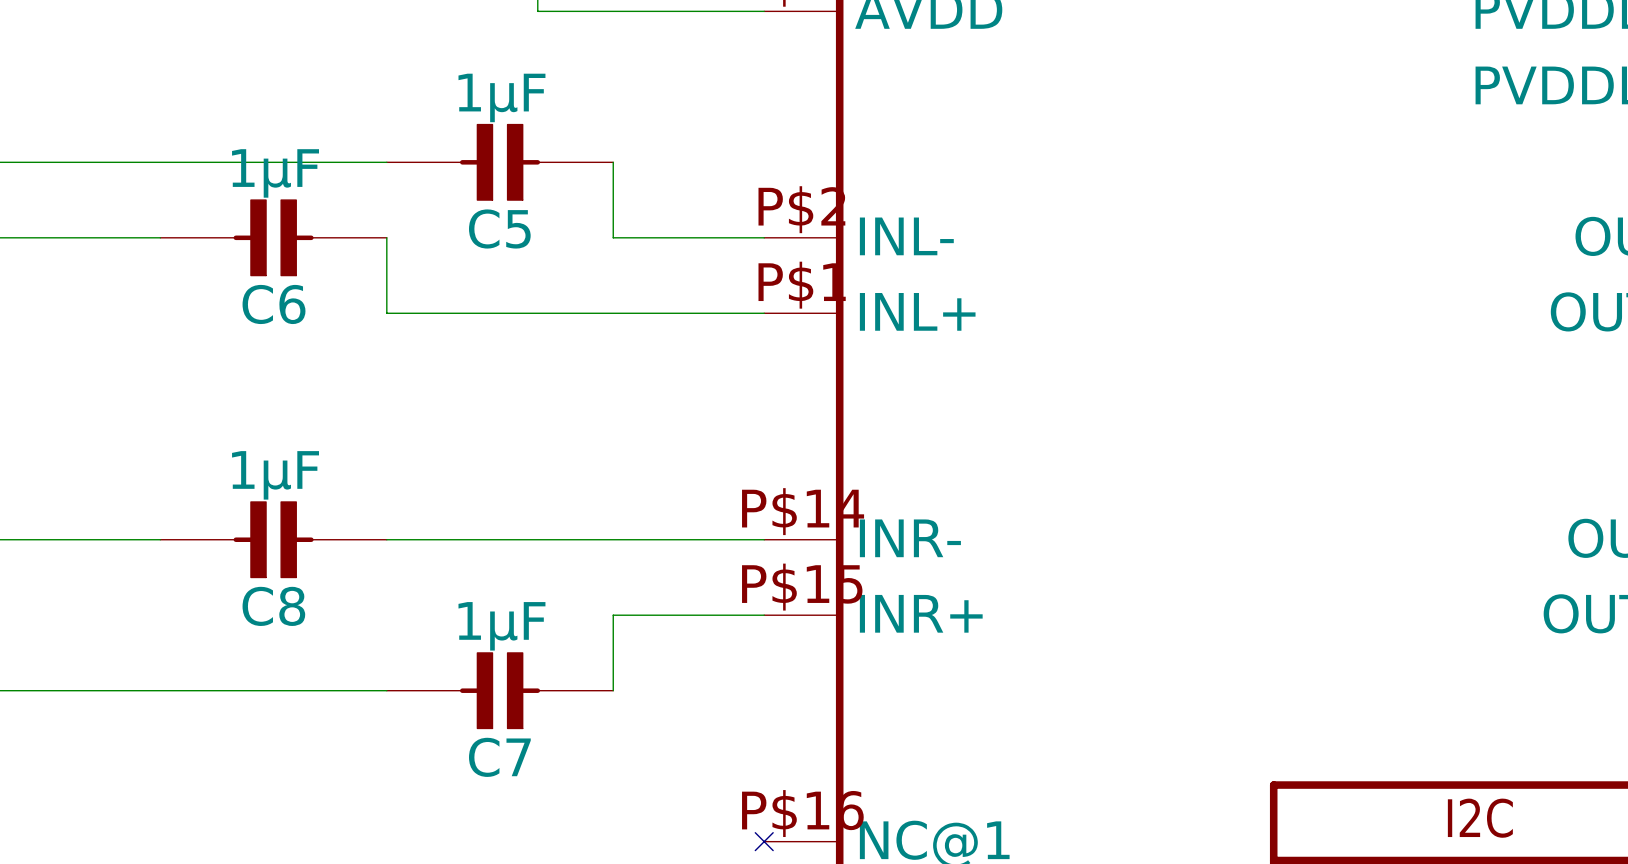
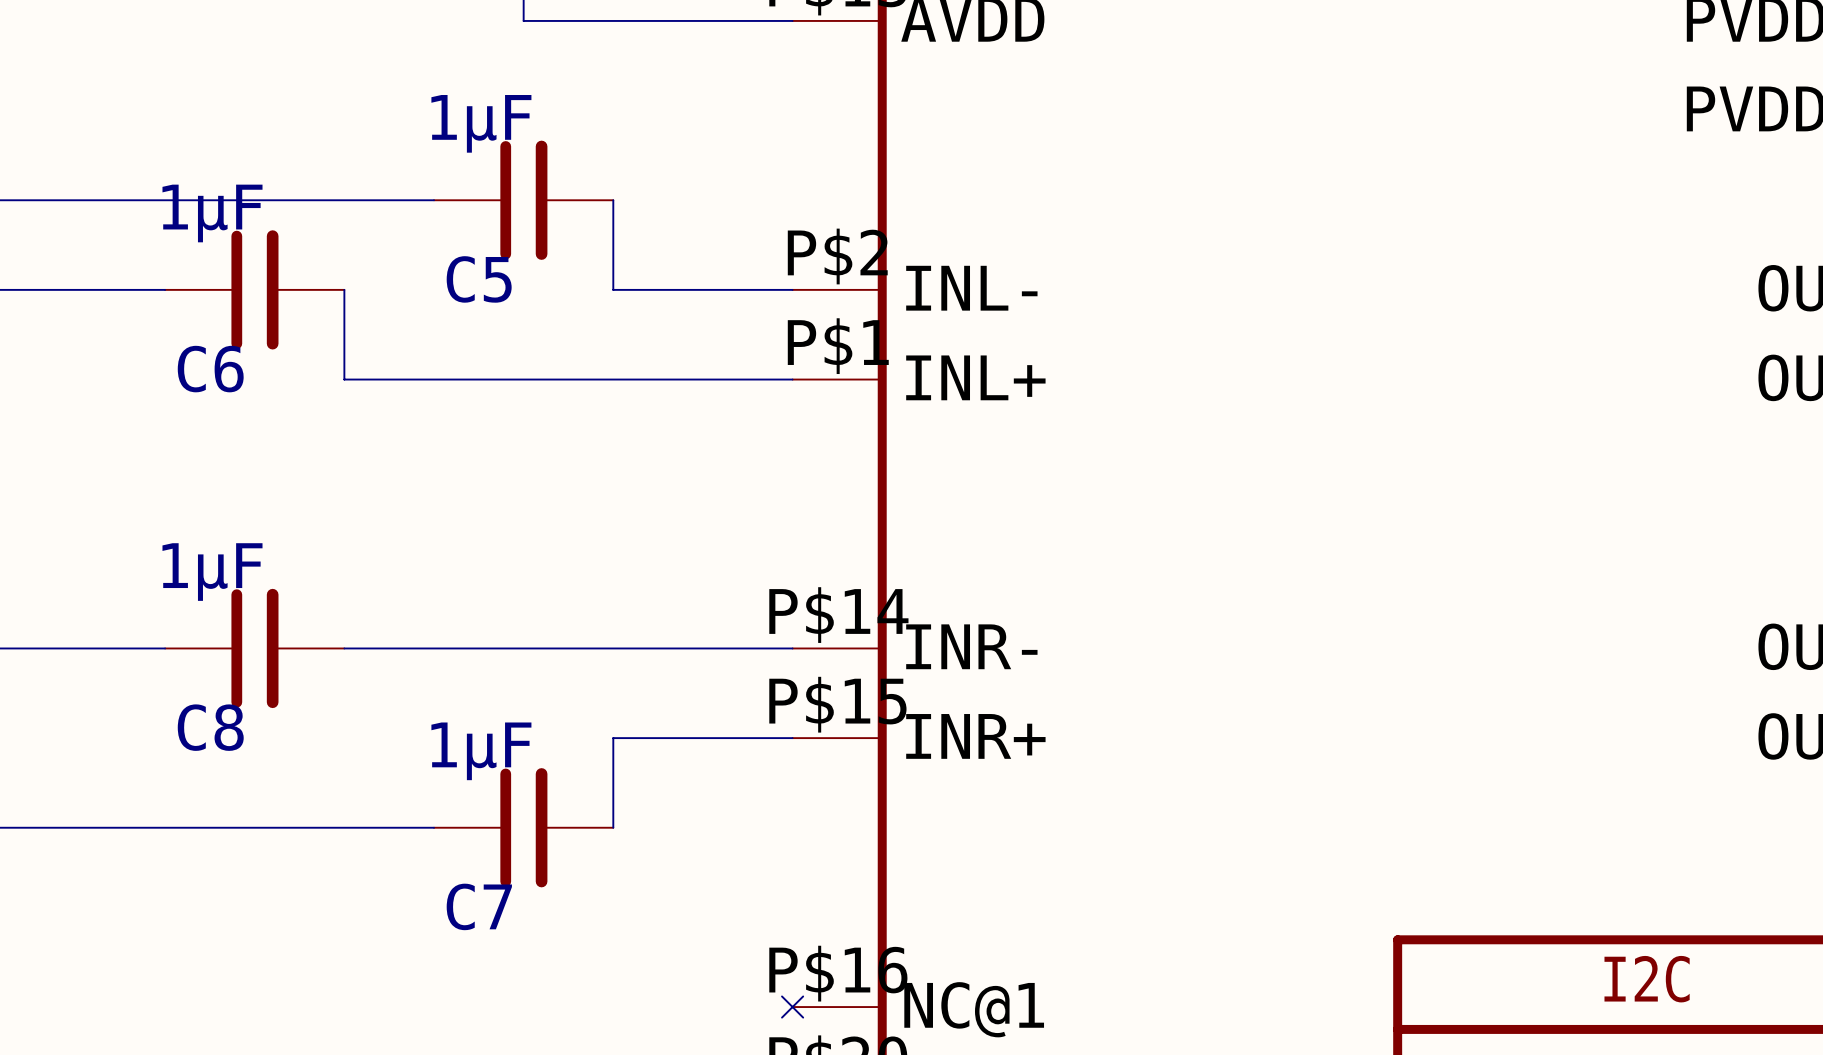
C5 symbol: [386, 124, 614, 201] -> [434, 140, 614, 260]
C6 symbol: [160, 200, 387, 276] -> [165, 230, 345, 350]
C8 symbol: [160, 501, 387, 578] -> [165, 588, 345, 709]
C7 symbol: [386, 652, 614, 729] -> [434, 768, 614, 888]

